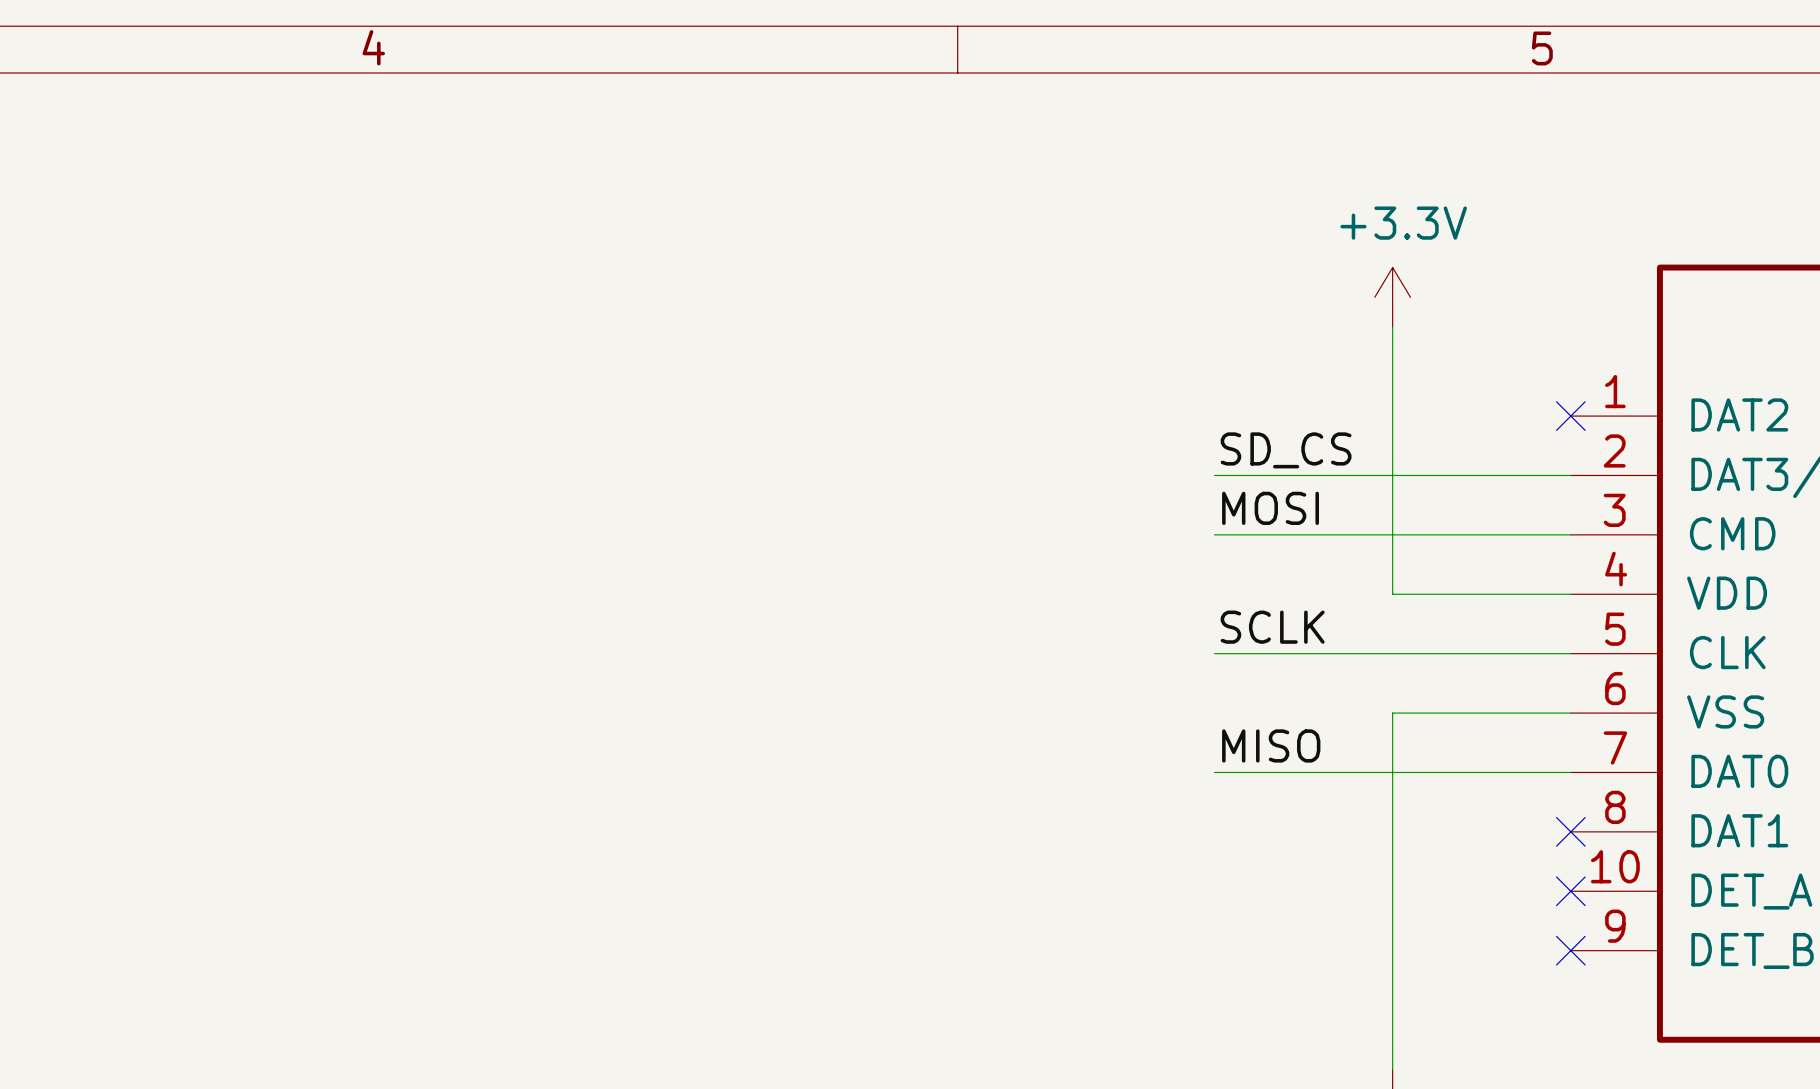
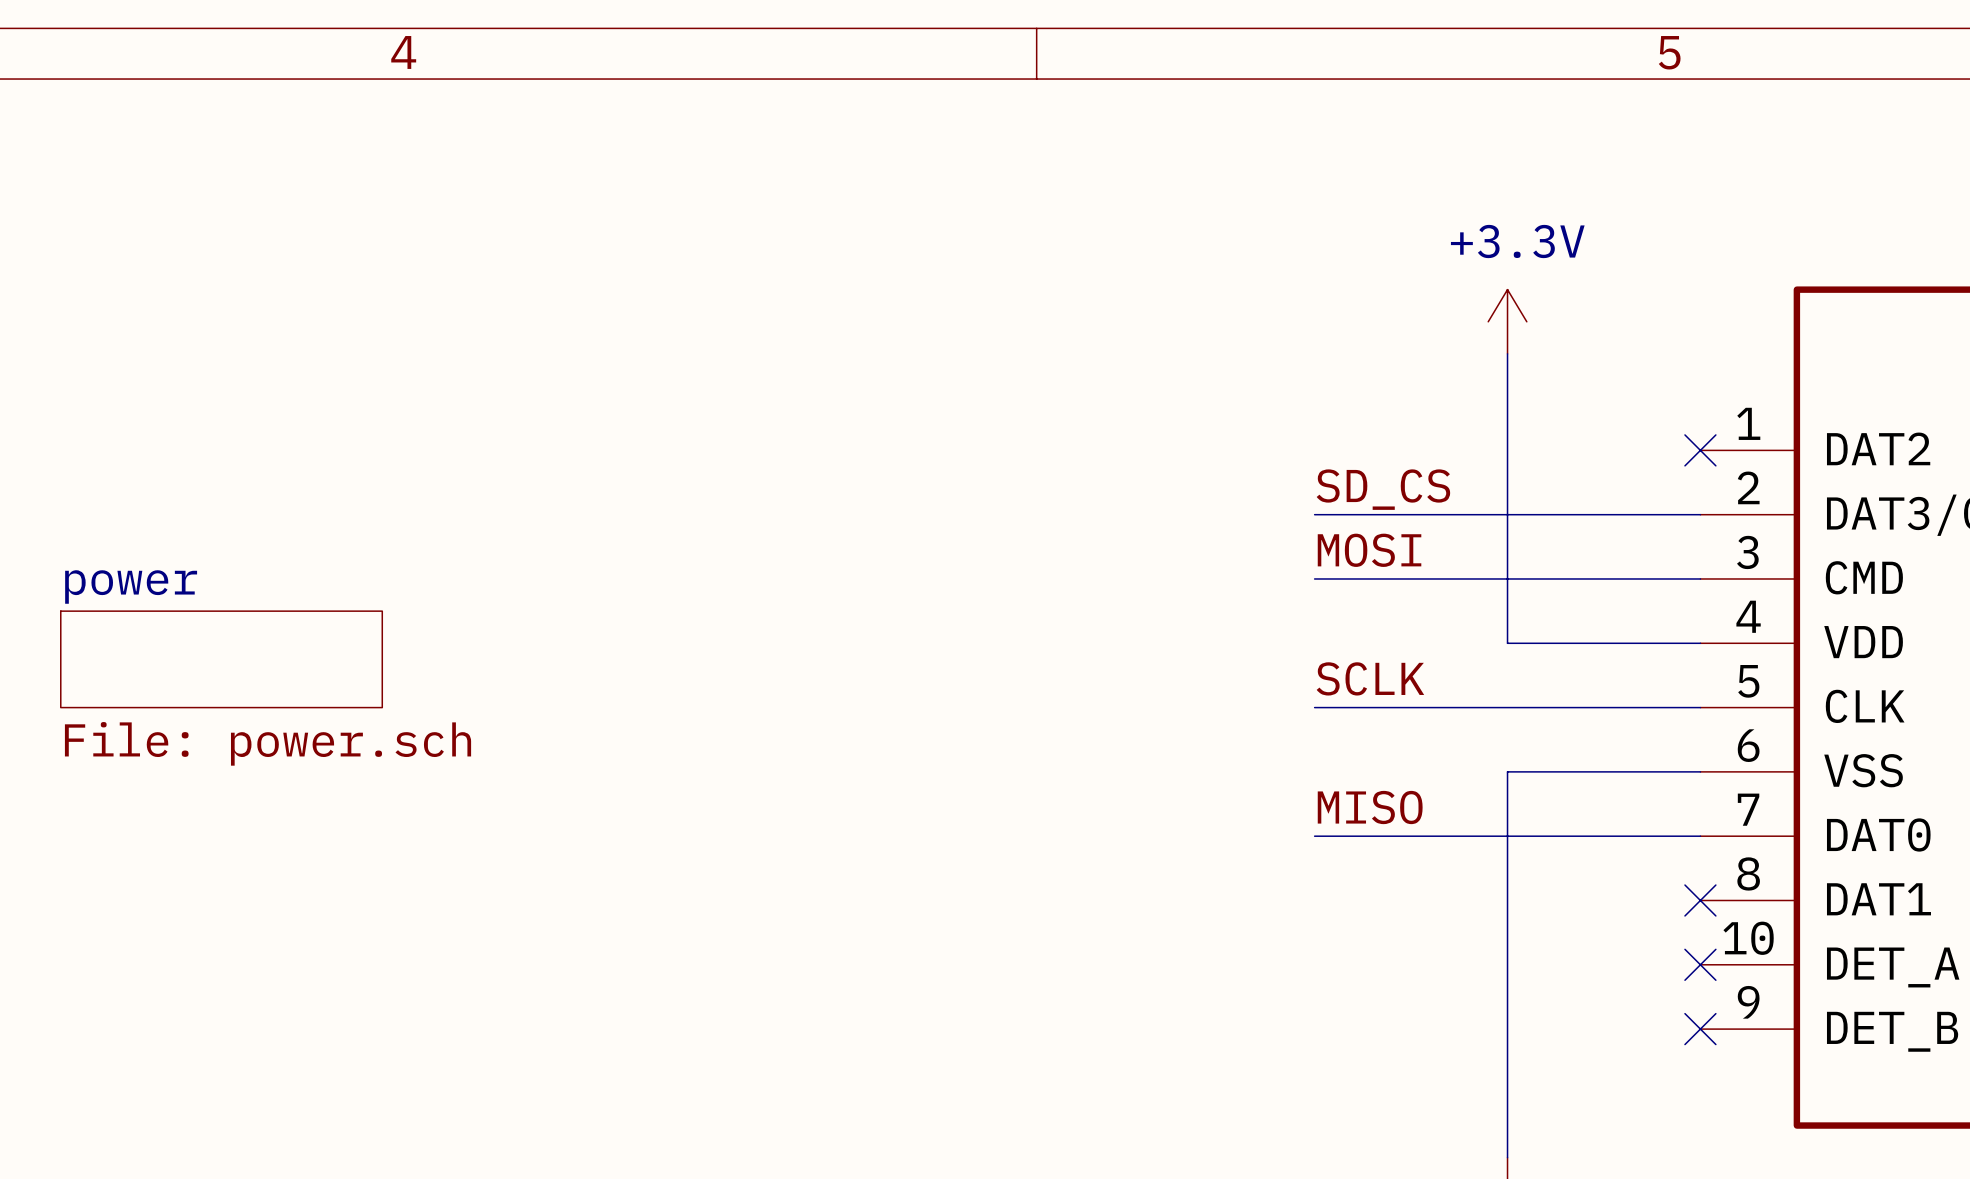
sheet power: none -> File: power.sch (221, 659)

